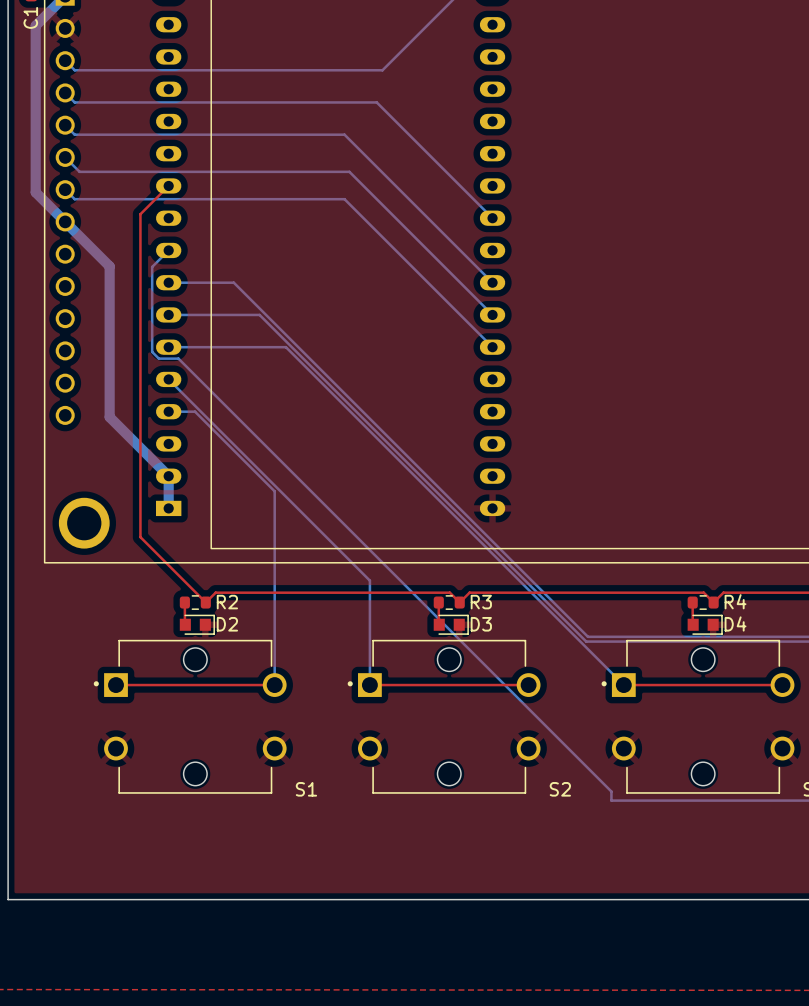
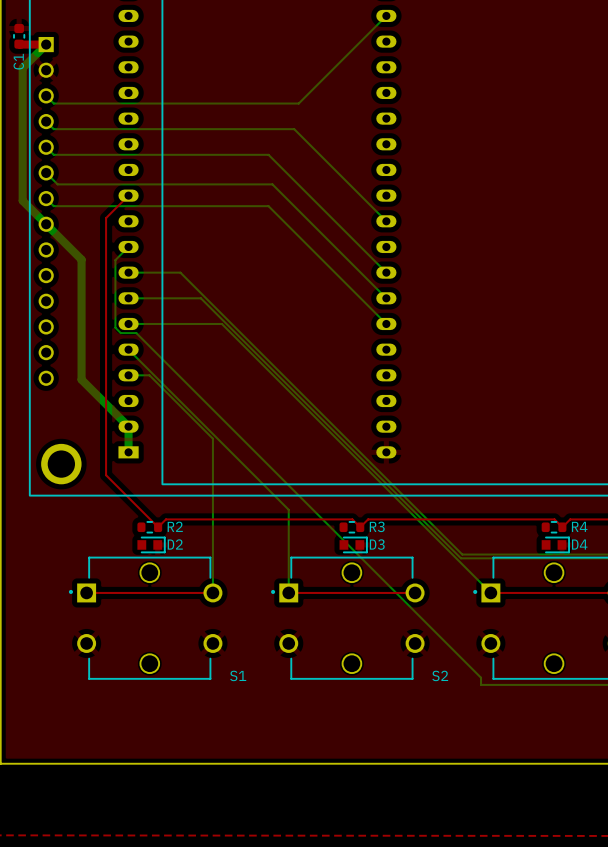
top track: (184, 602) (185, 624) -> none
top track: (438, 602) (439, 624) -> none
top track: (692, 602) (693, 624) -> none

